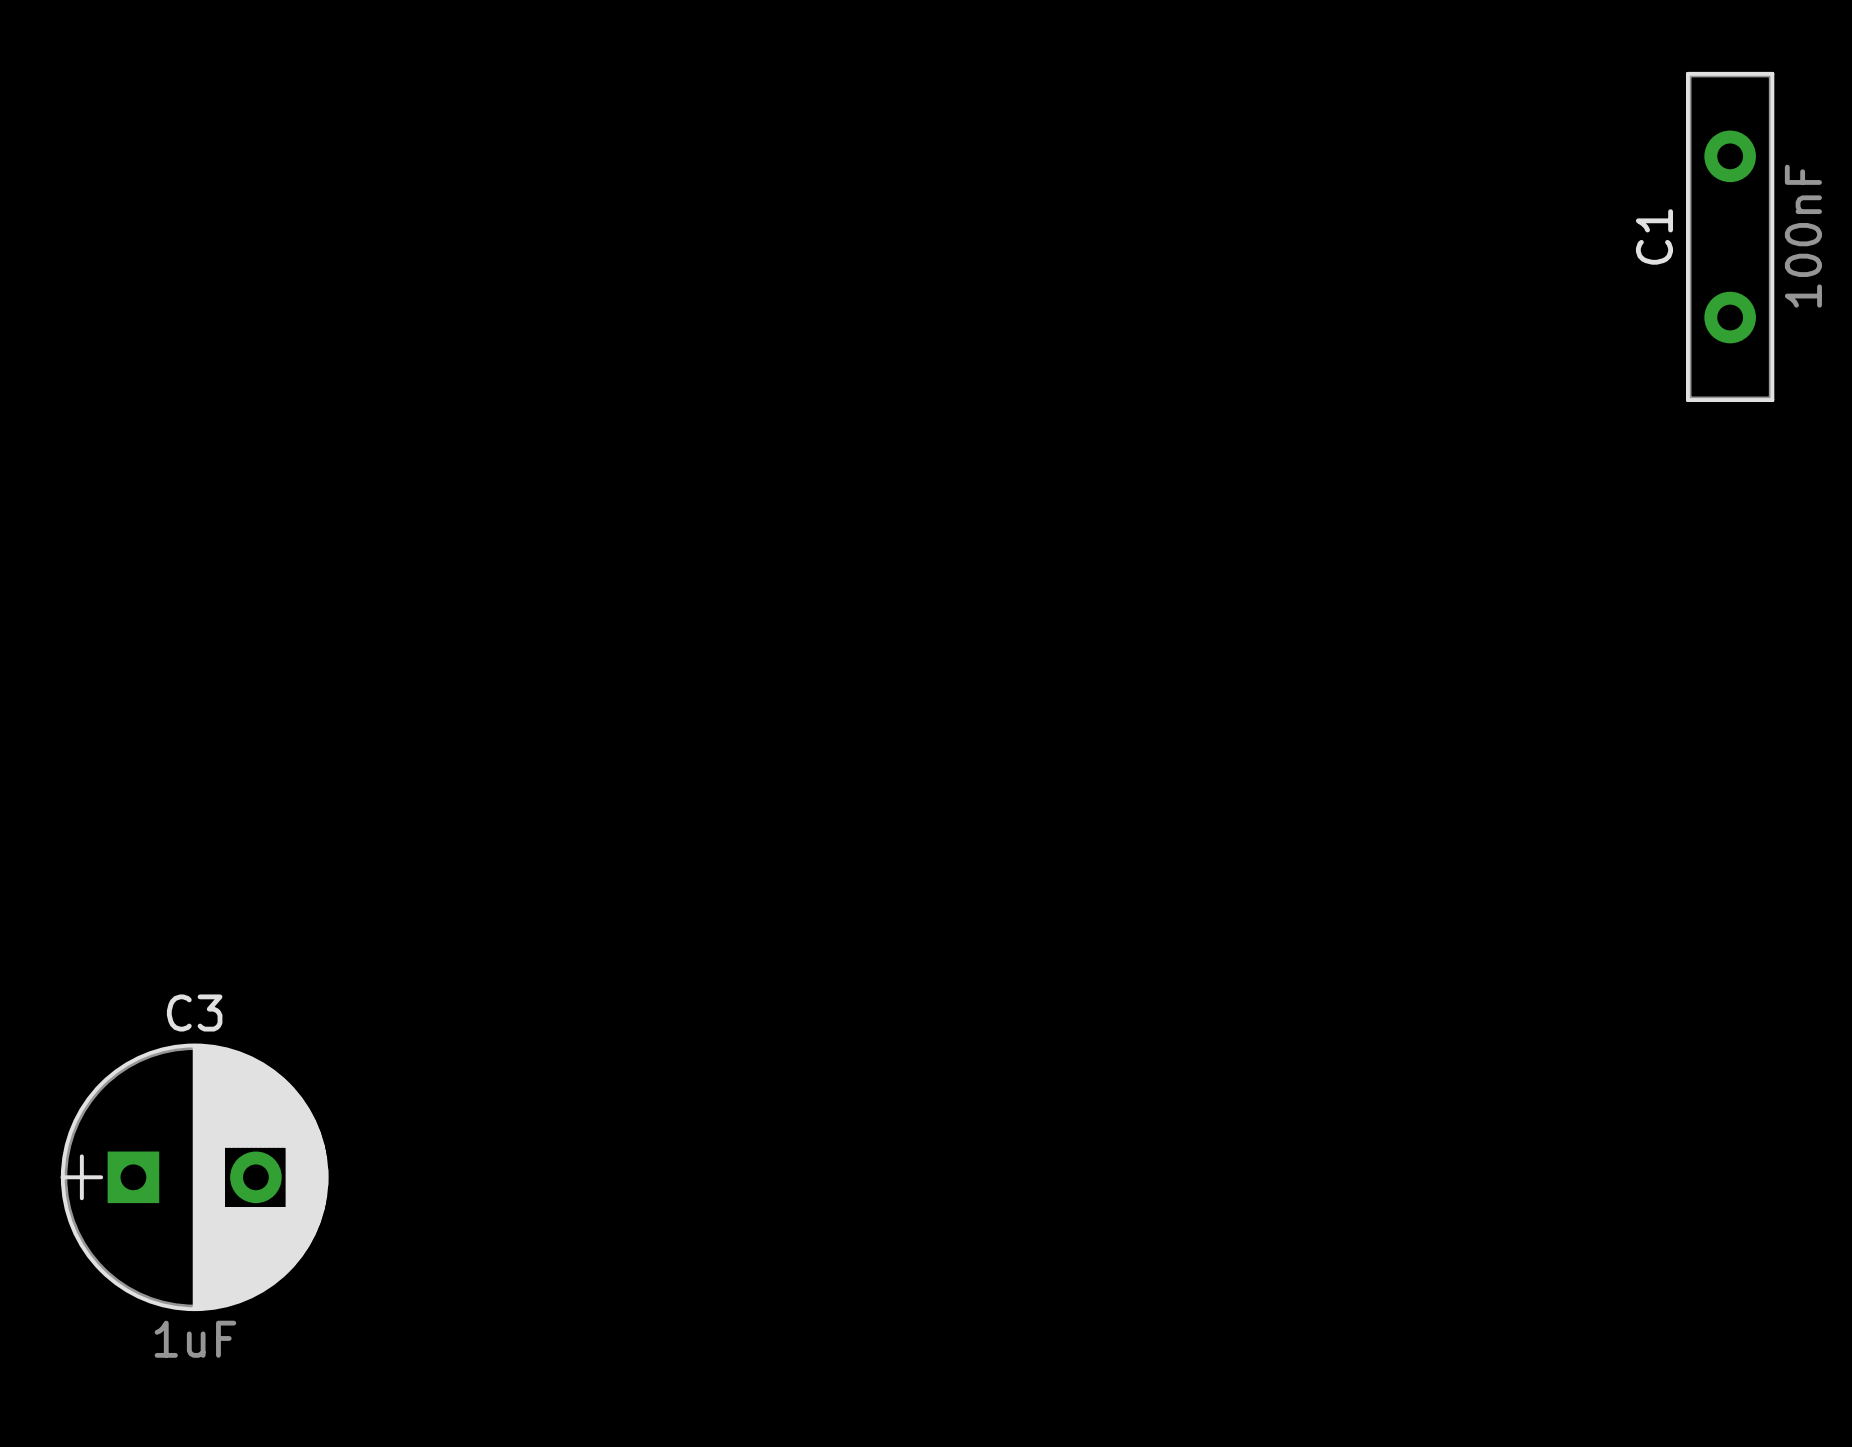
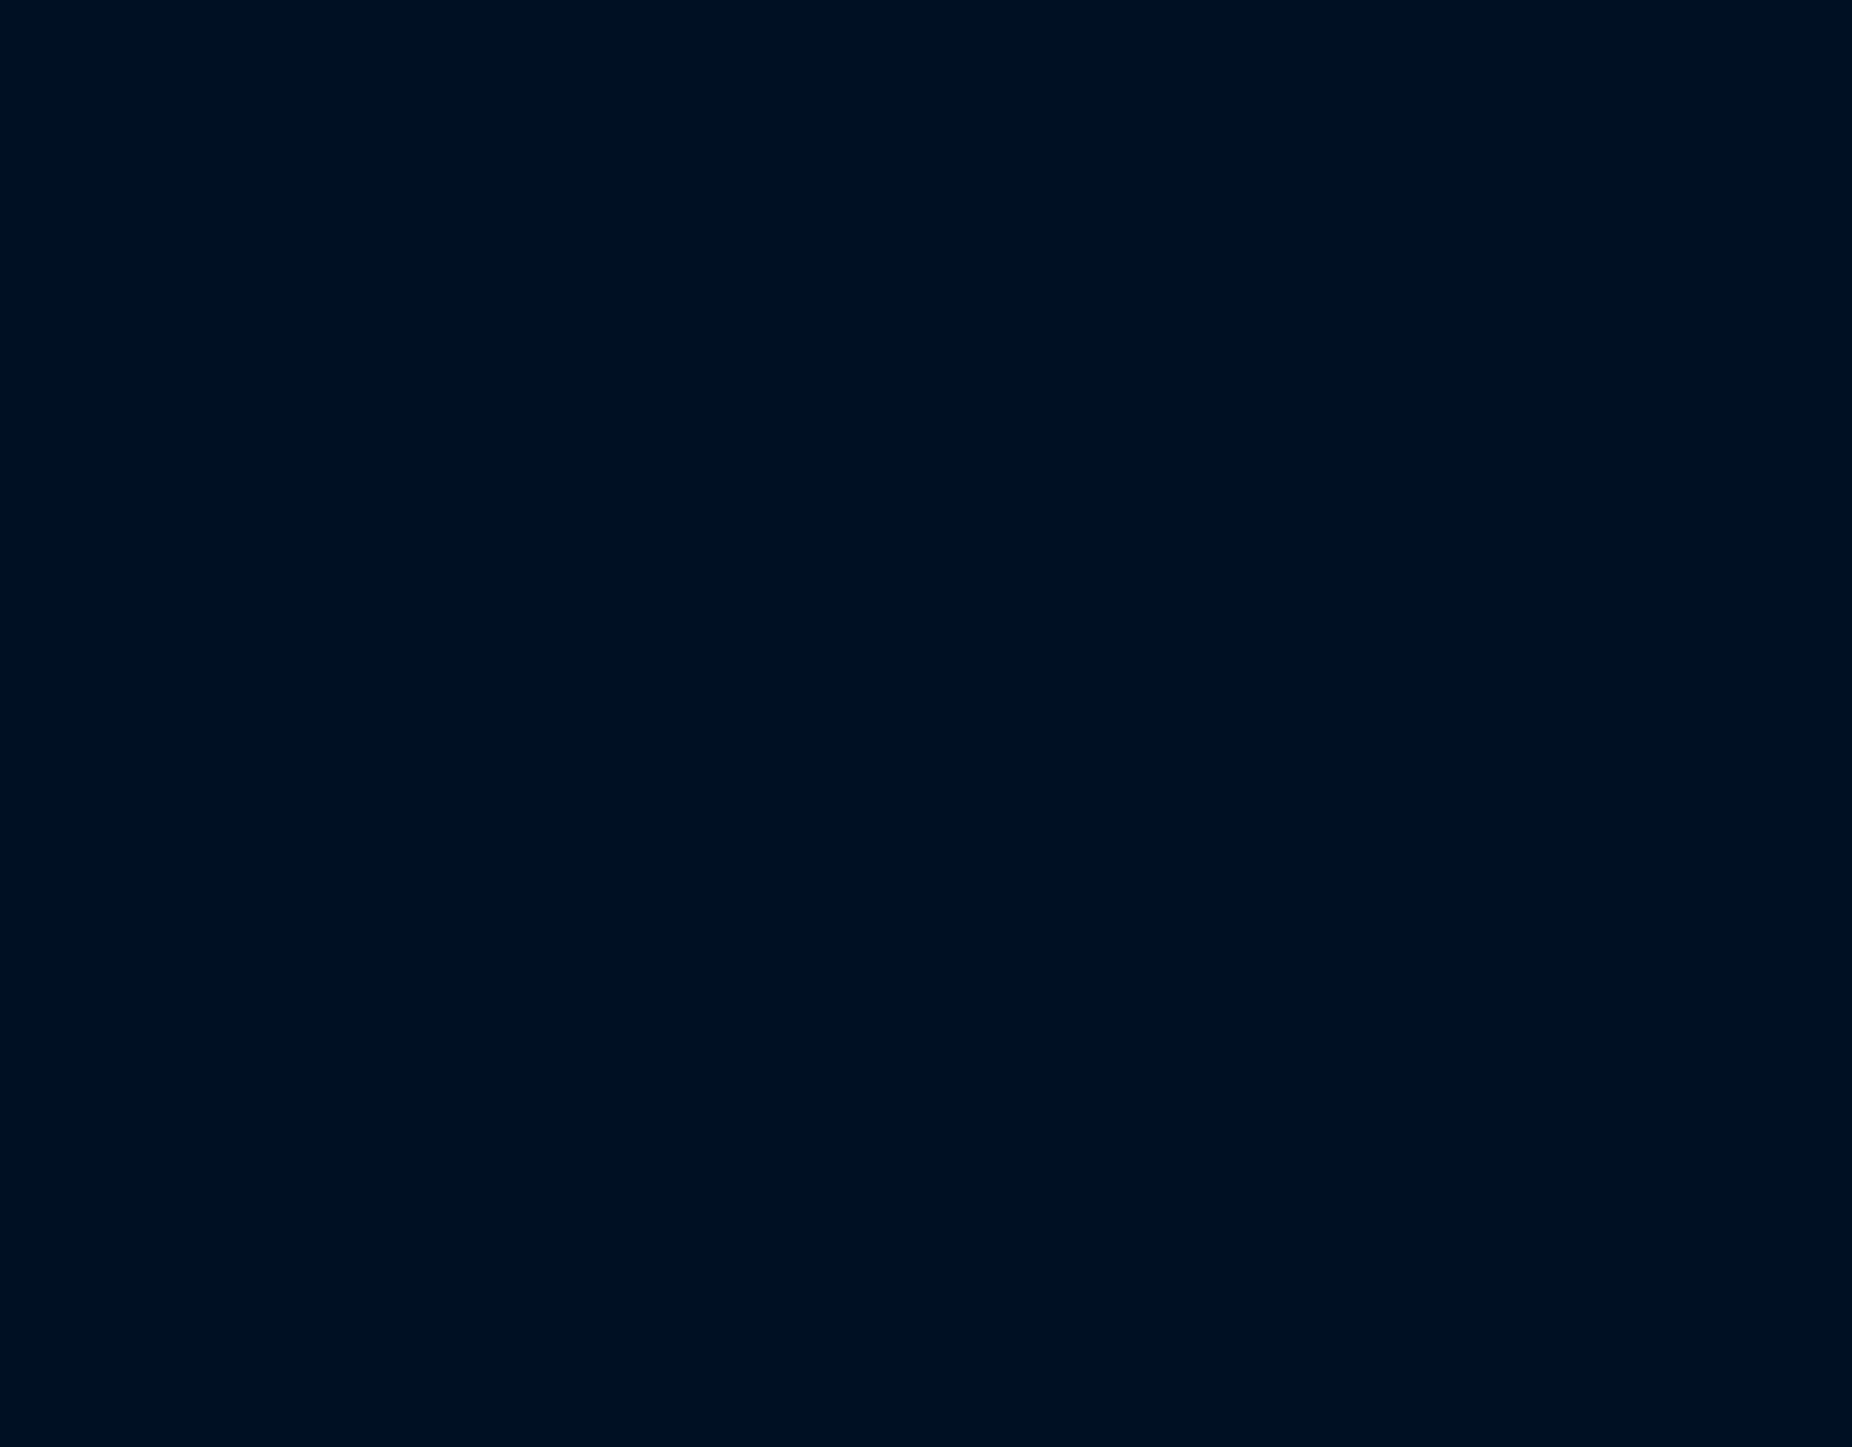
C1: 100nF (1730, 236) -> none
C3: 1uF (194, 1177) -> none

